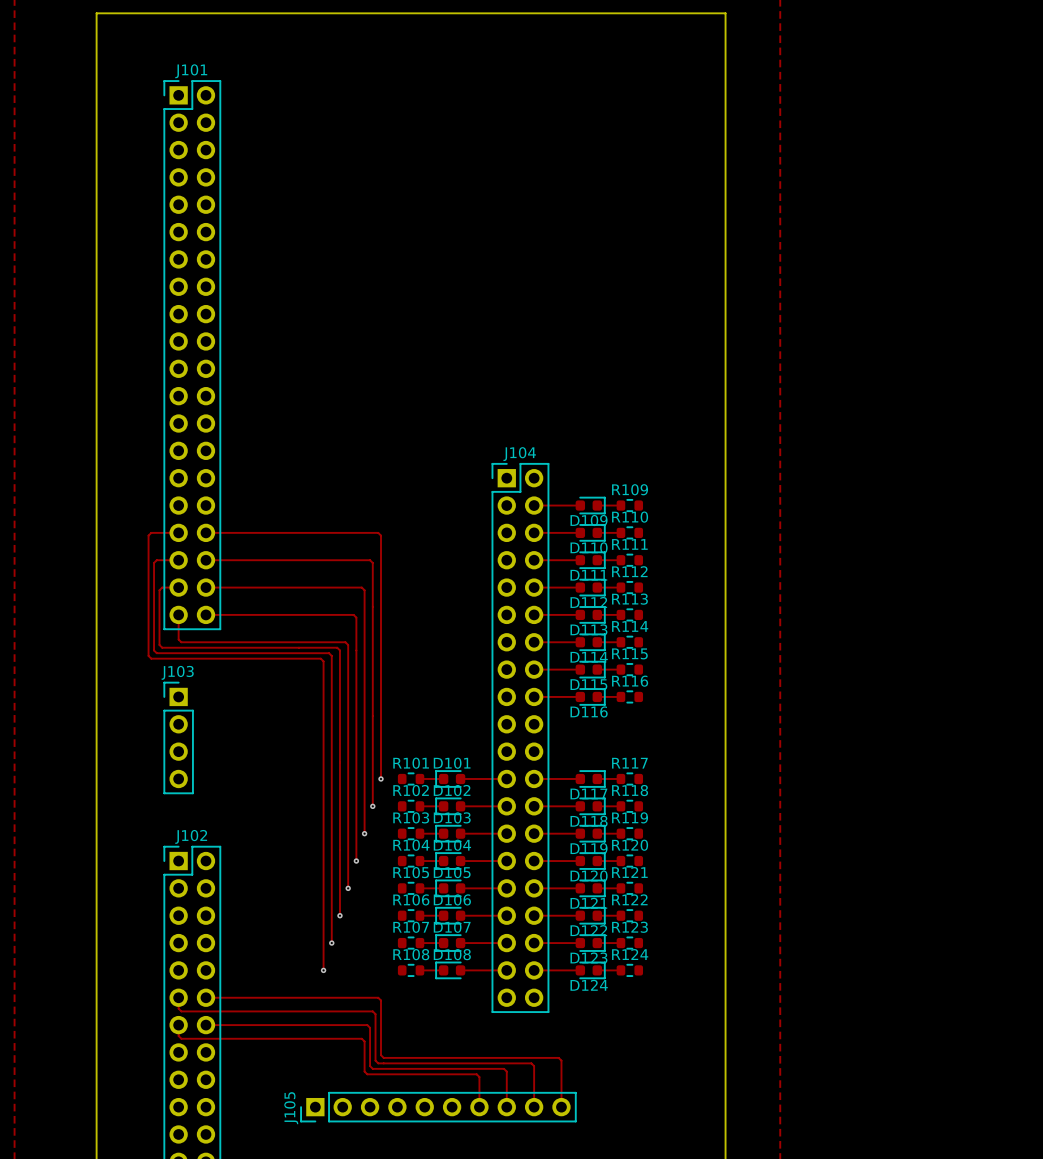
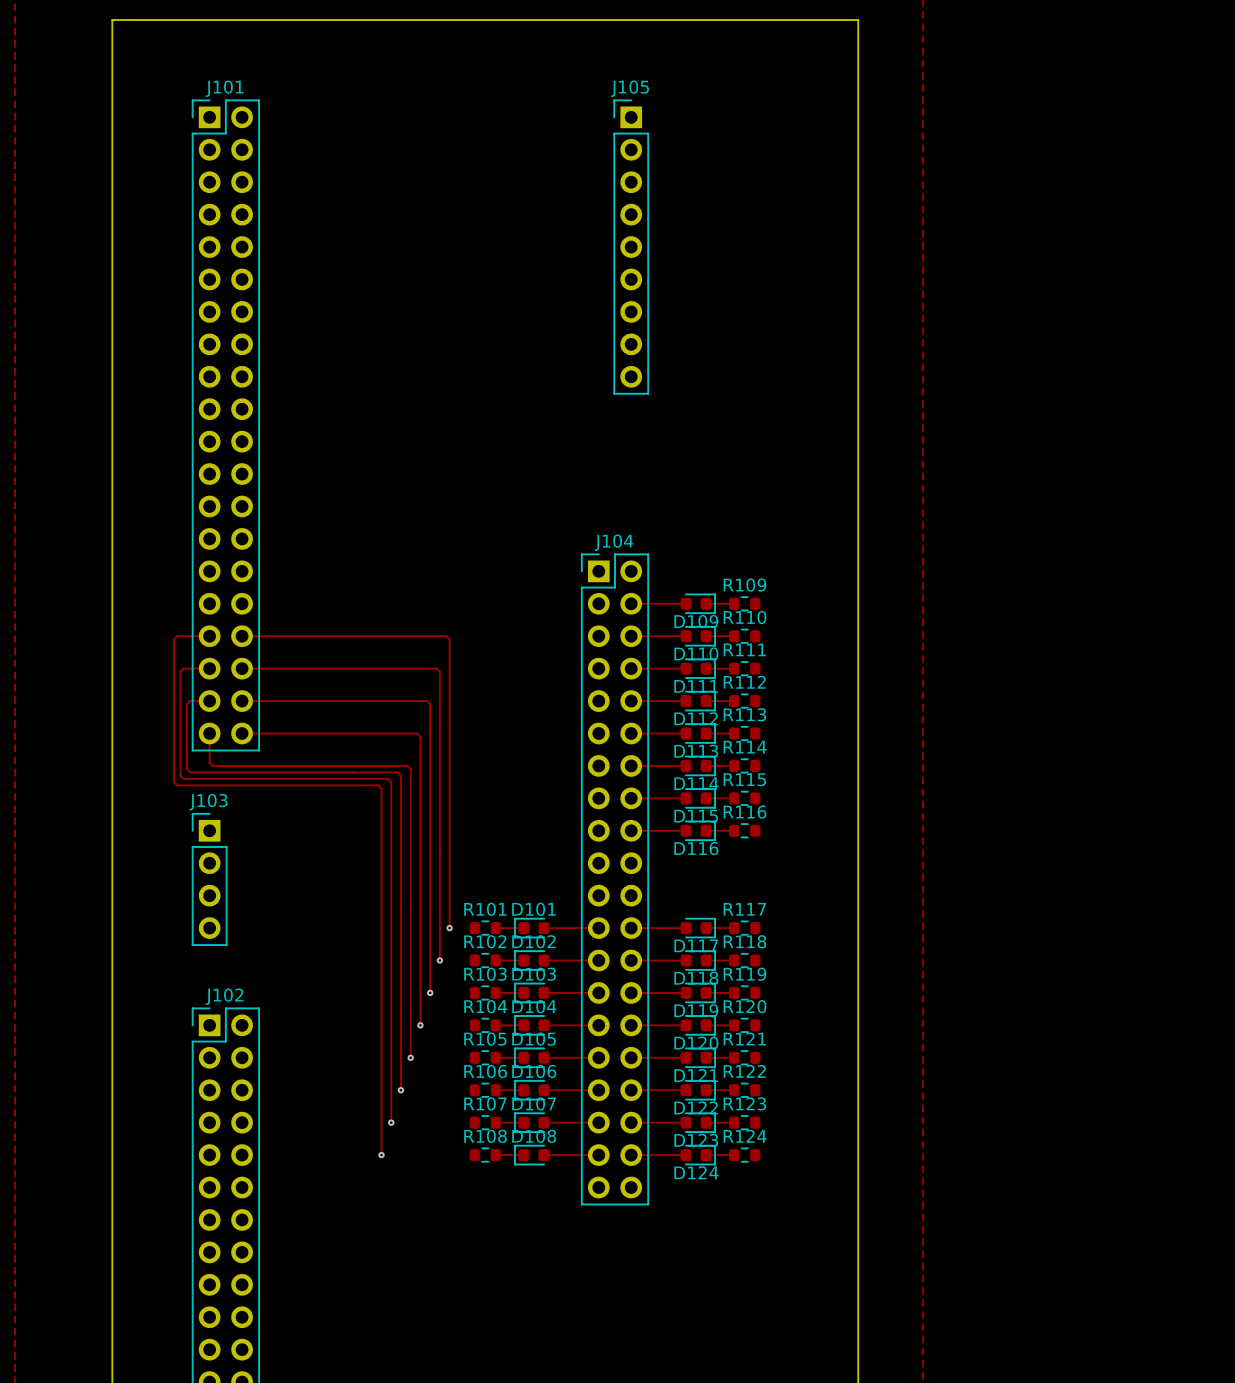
track: (178, 997) (178, 1008) (181, 1011) (372, 1011) (375, 1014) (375, 1060) (378, 1063) (531, 1063) (534, 1066) (534, 1107) -> none
track: (205, 997) (378, 997) (381, 1000) (381, 1055) (383, 1057) (558, 1057) (561, 1060) (561, 1107) -> none
track: (178, 1025) (178, 1036) (181, 1038) (361, 1038) (364, 1041) (364, 1071) (367, 1074) (476, 1074) (479, 1077) (479, 1107) -> none
track: (205, 1025) (367, 1025) (370, 1027) (370, 1066) (372, 1068) (504, 1068) (506, 1071) (506, 1107) -> none
J105 footprint: [300, 1092, 577, 1123] -> [613, 99, 649, 395]
J105 name position: J105 (291, 1108) -> J105 (630, 88)

